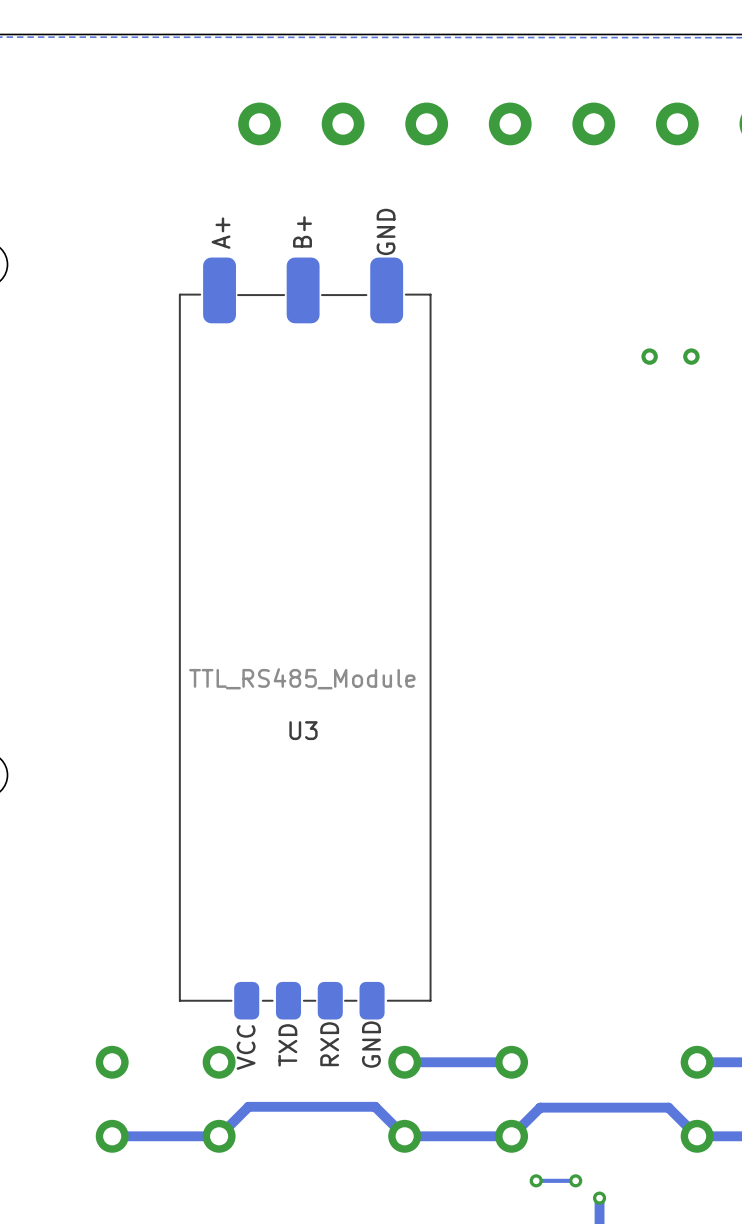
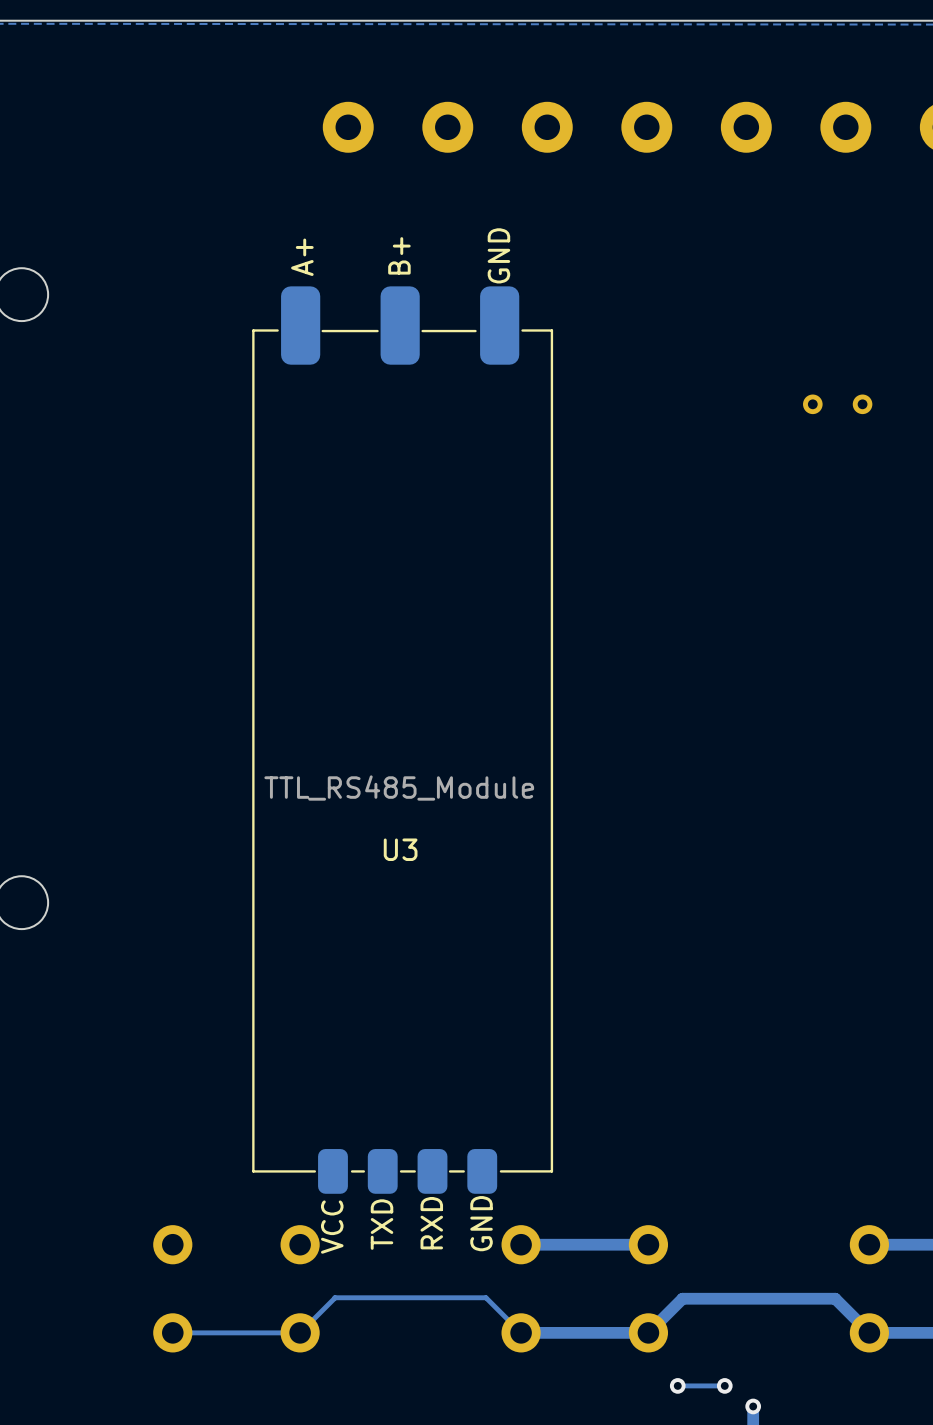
track width: thick (248, 1106) (375, 1106) (404, 1136) -> thin (334, 1297) (485, 1297) (521, 1332)
track width: thick (248, 1107) (219, 1136) (112, 1136) -> thin (334, 1298) (300, 1332) (172, 1332)

